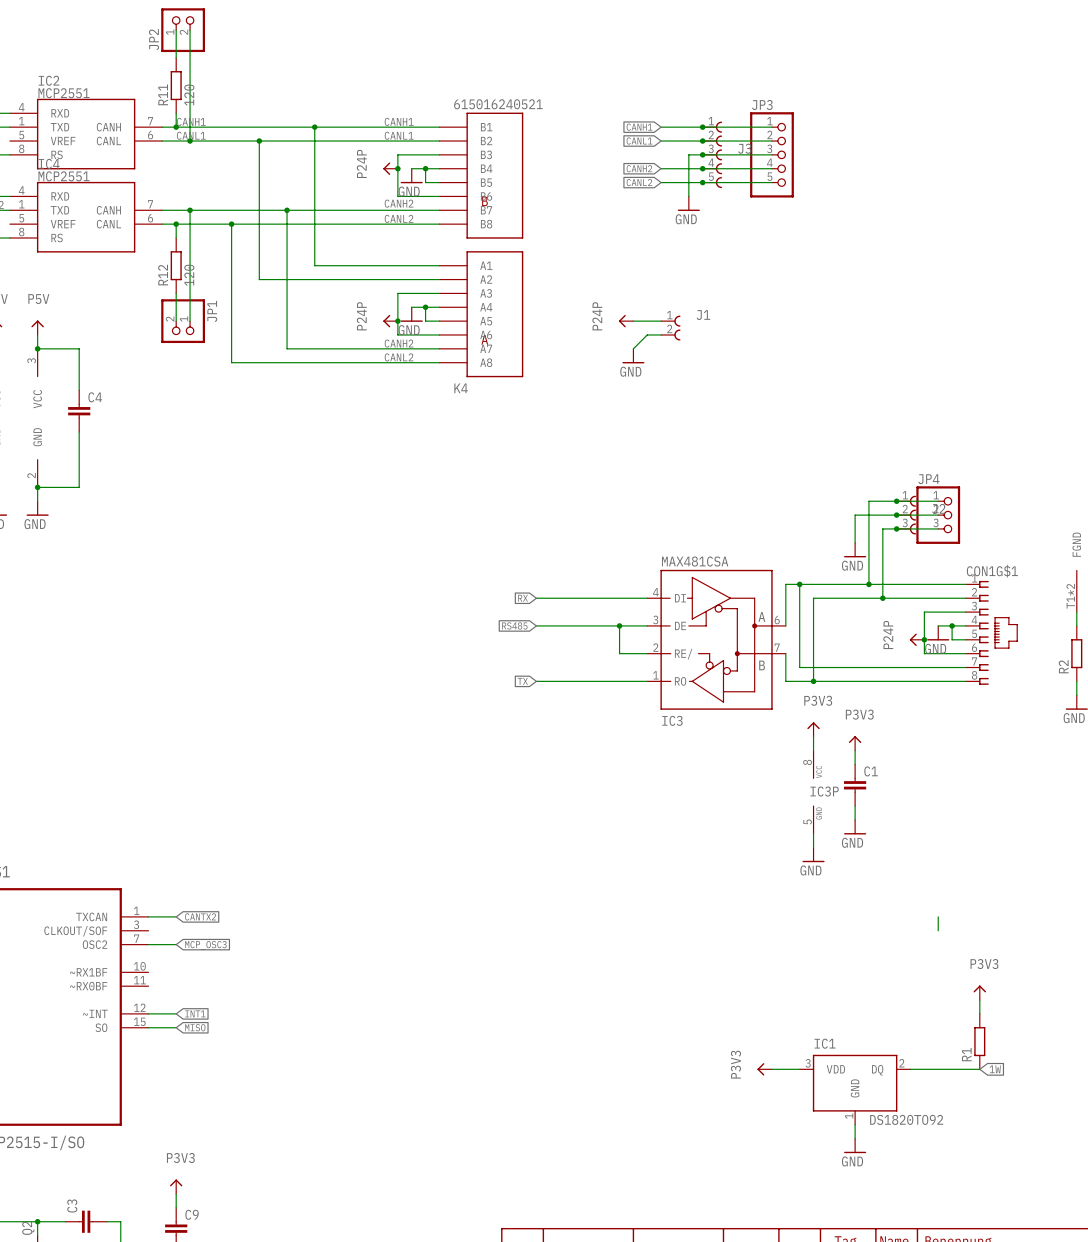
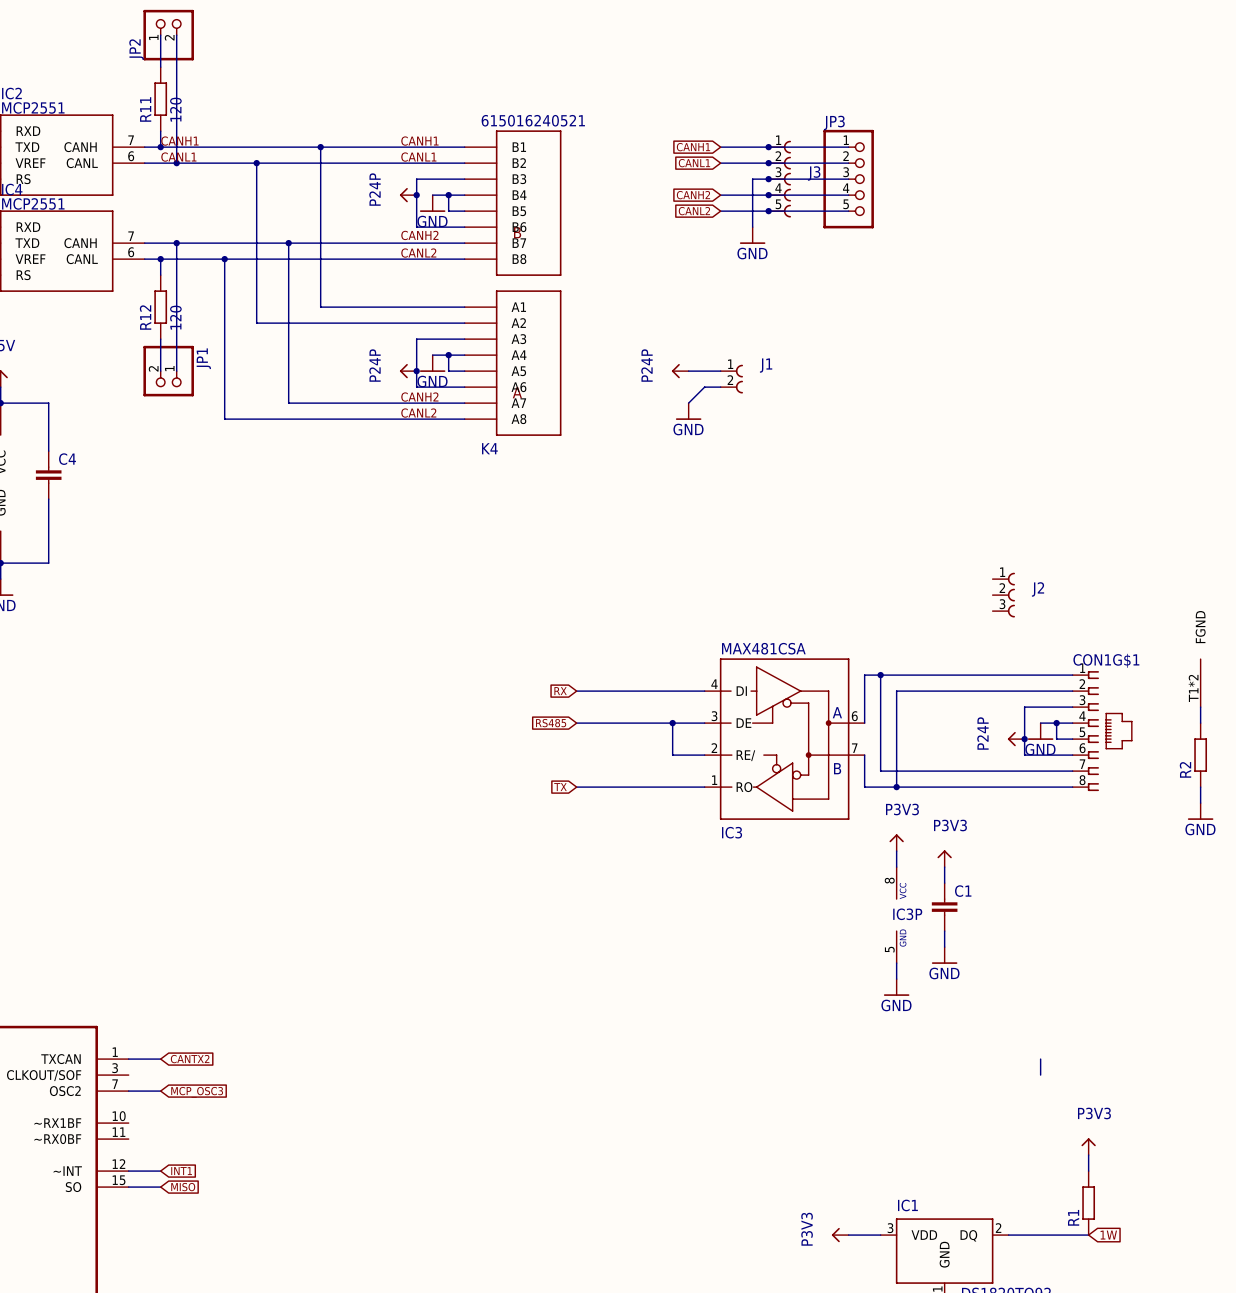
junction: (896, 501) -> none
wire: (938, 501) (868, 501) (868, 584) -> none
junction: (896, 515) -> none
wire: (938, 515) (855, 515) (855, 542) -> none
JP4: (938, 515) -> none
junction: (896, 528) -> none
wire: (938, 528) (882, 528) (882, 598) -> none
power symbol: GND (855, 550) -> none
junction: (868, 584) -> none
junction: (882, 598) -> none

